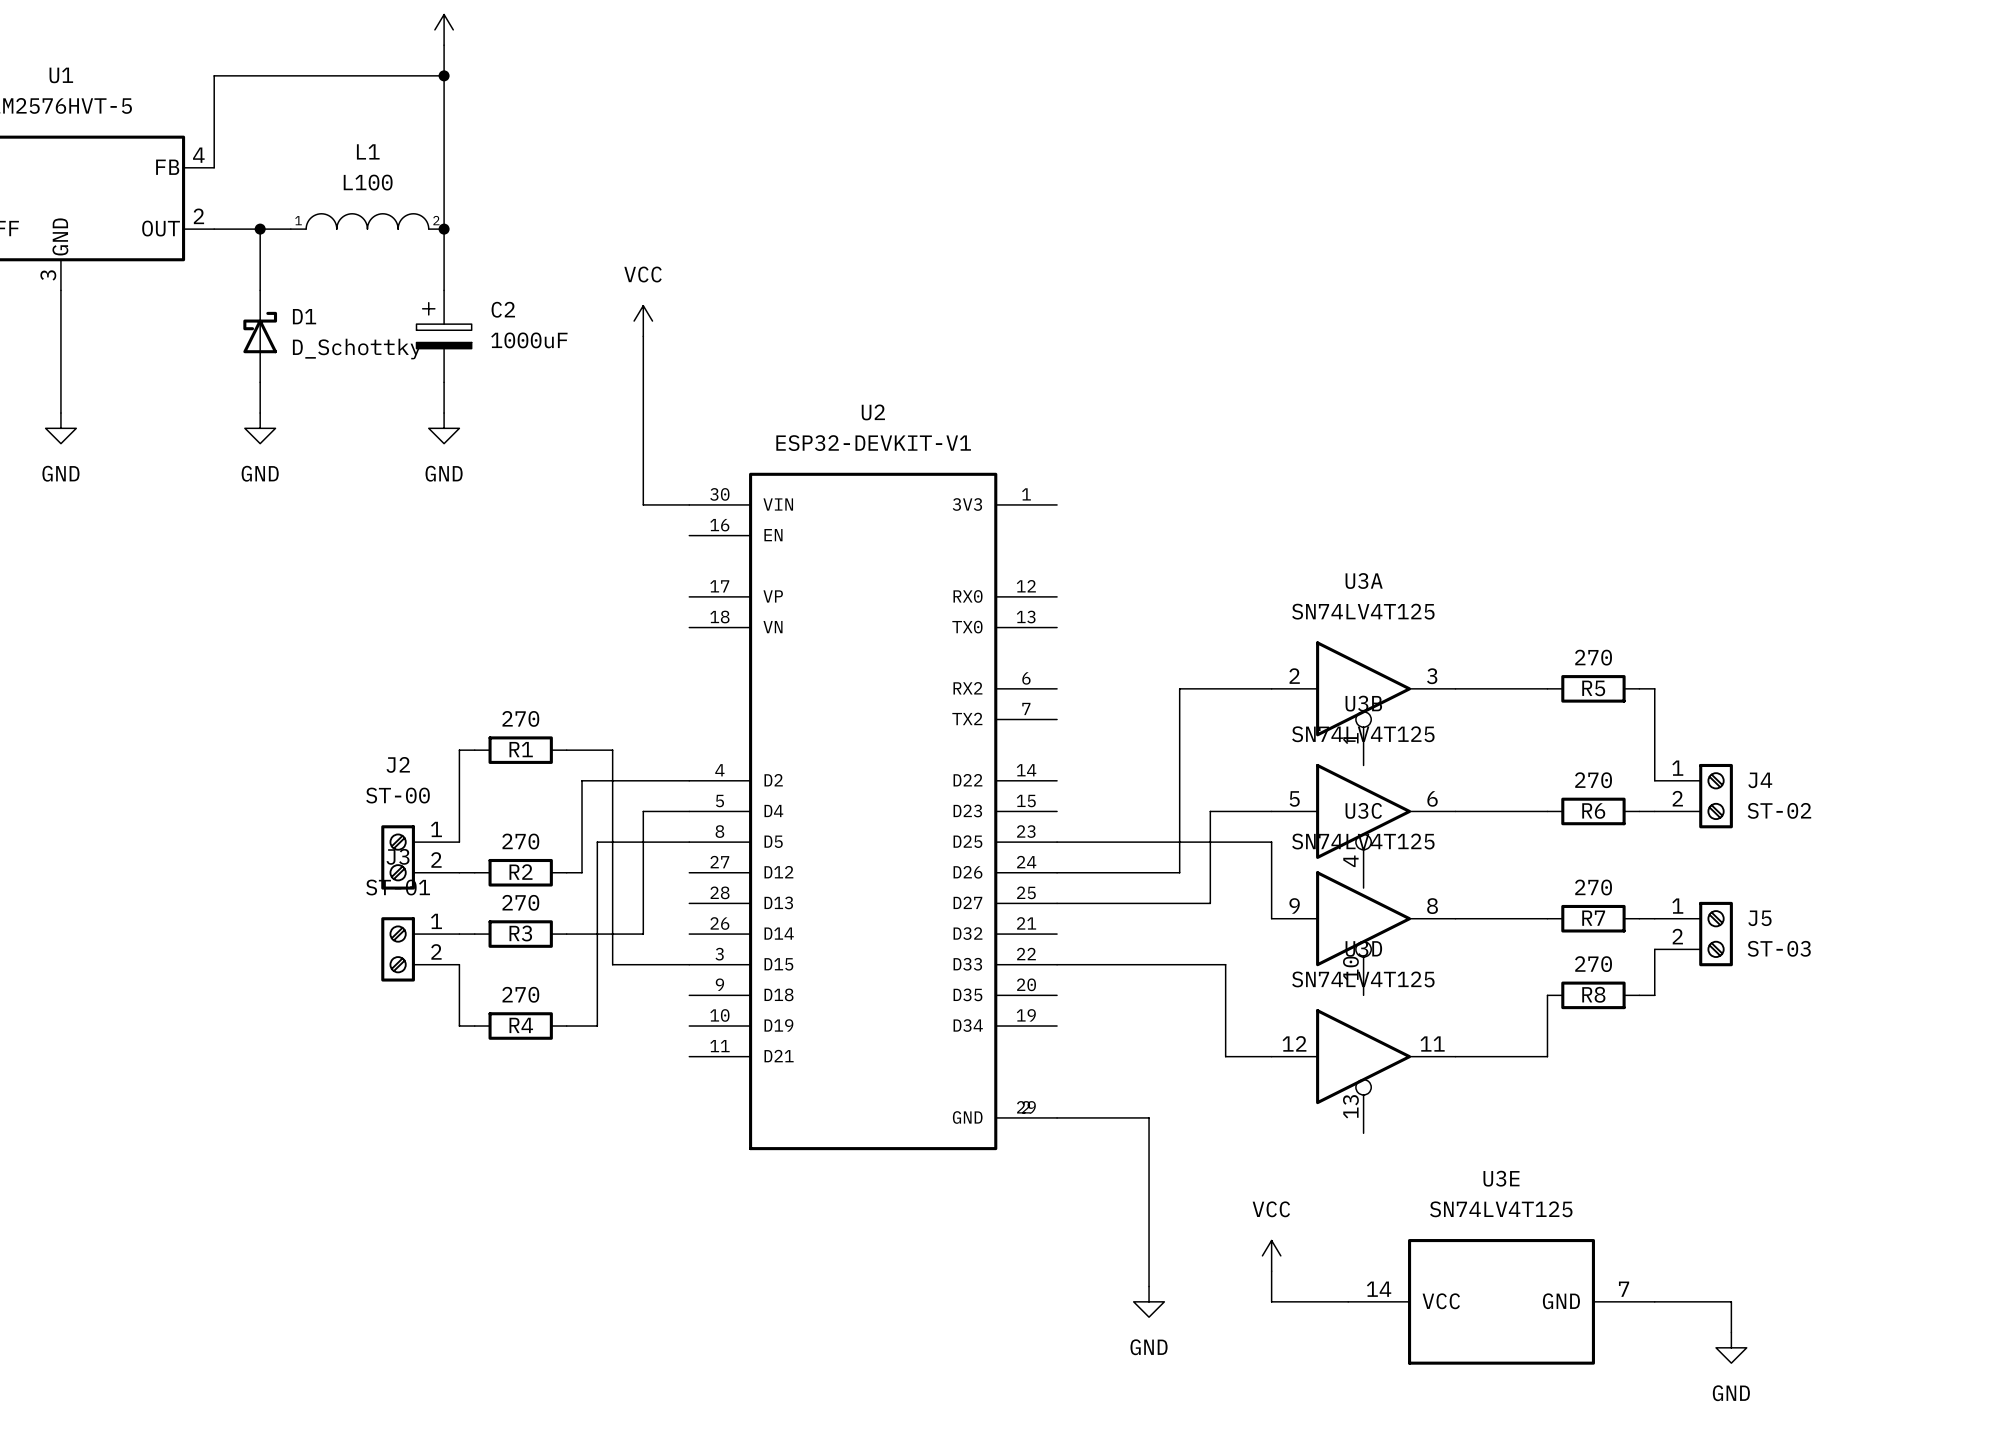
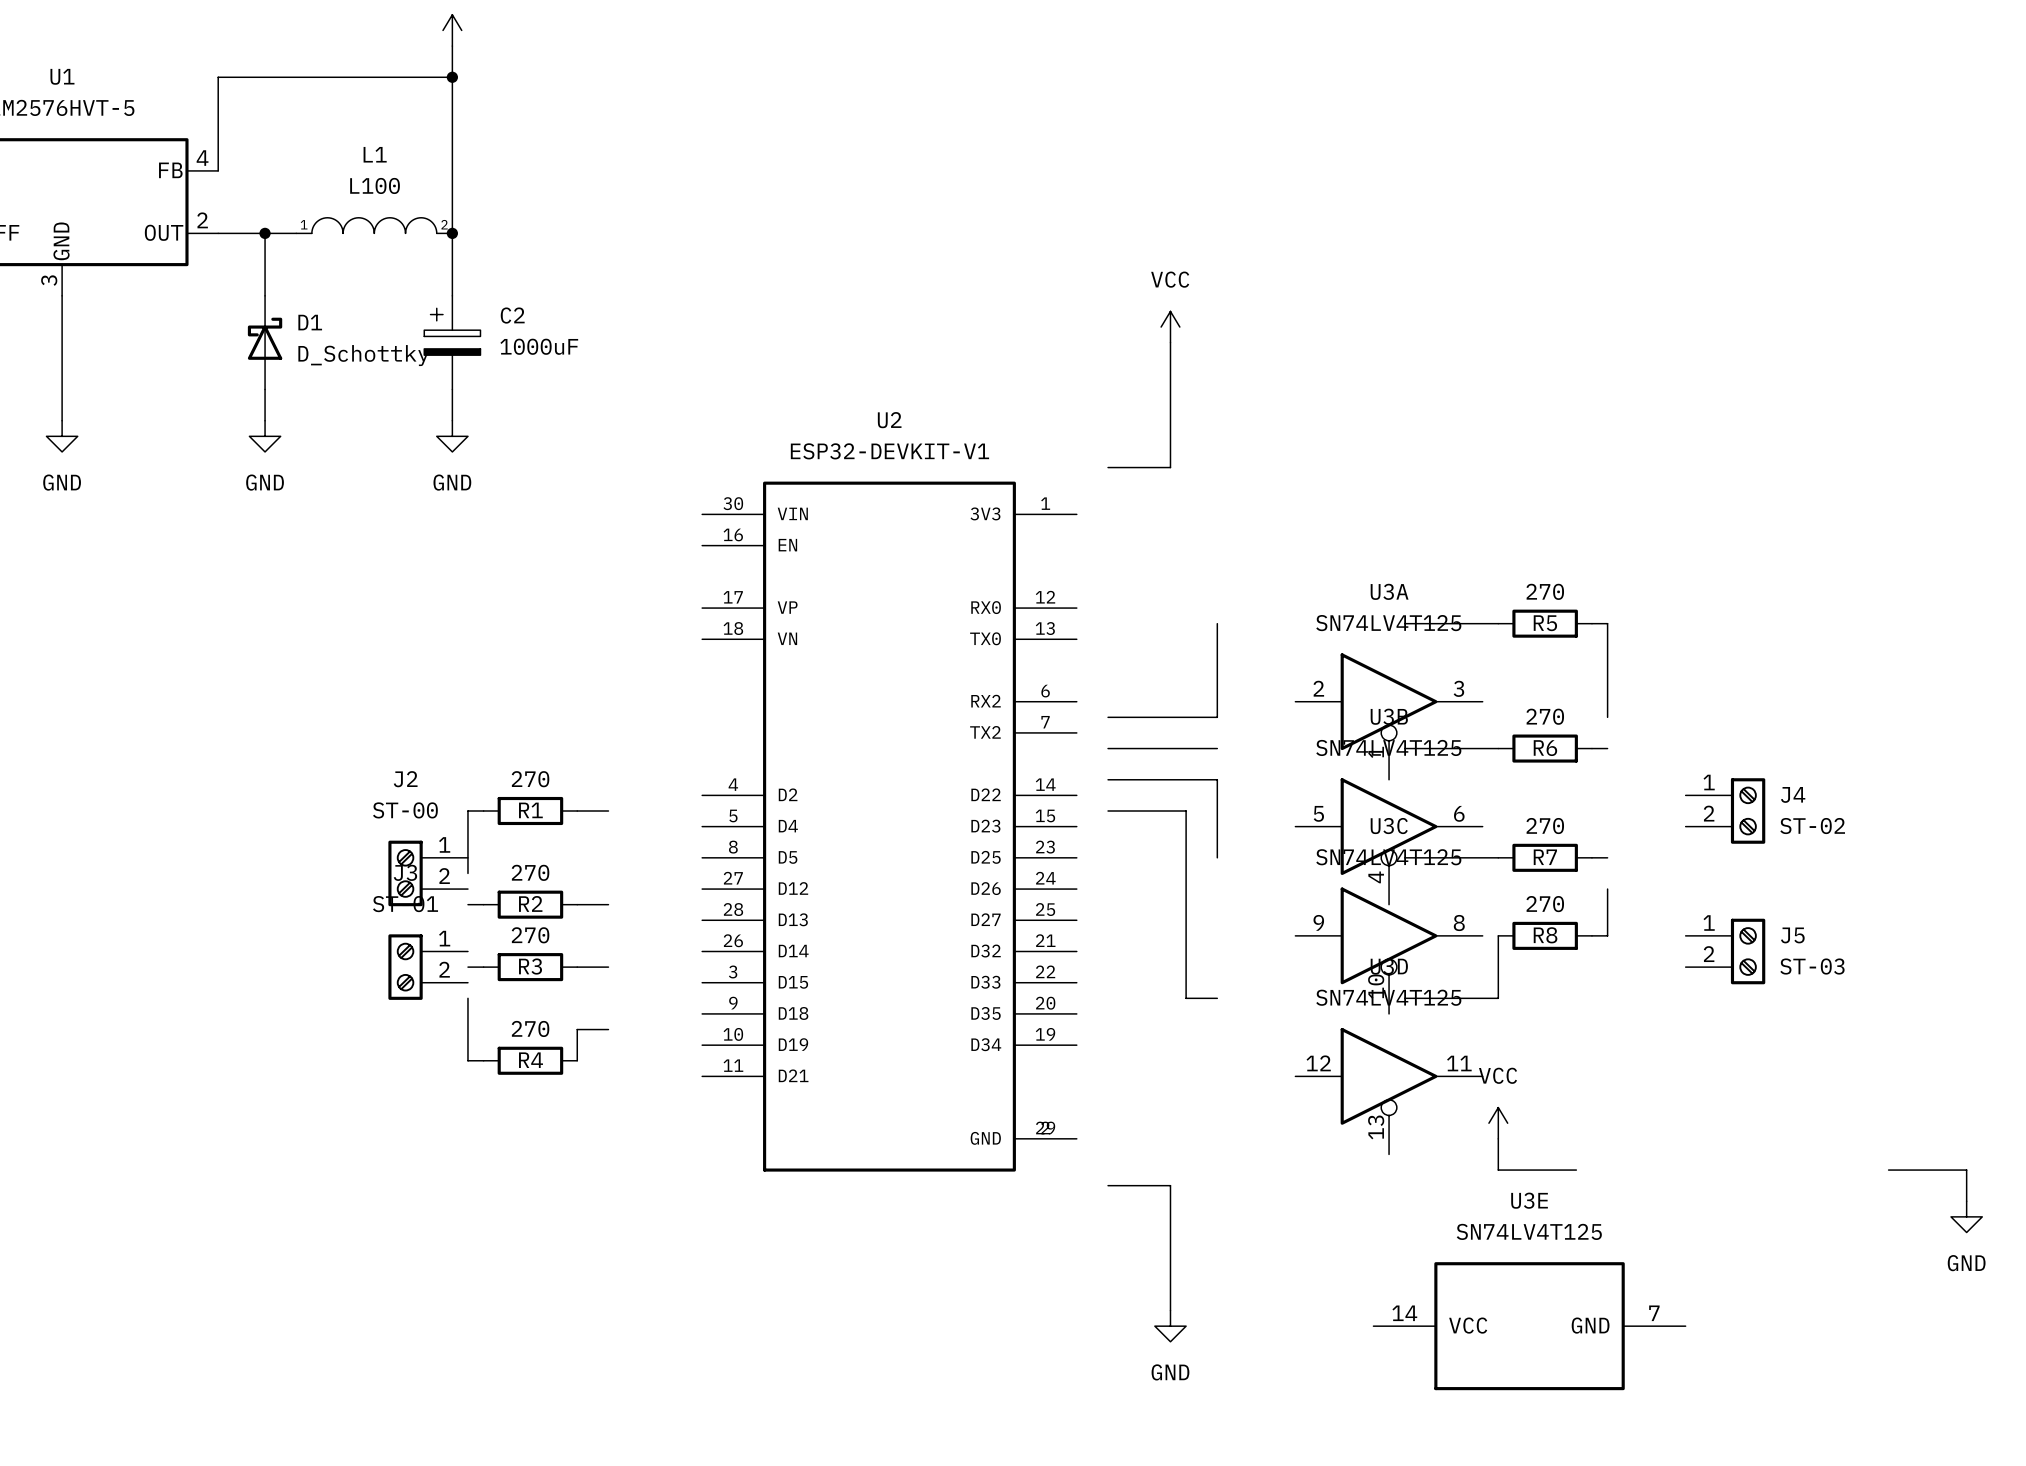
power symbol: VCC (643, 321) -> none
power symbol: none -> VCC (1170, 327)
wire: (643, 336) (643, 504) (689, 504) -> none
wire: none -> (1170, 342) (1170, 467) (1108, 467)
wire: none -> (1217, 623) (1217, 717) (1108, 717)
wire: (1271, 688) (1179, 688) (1179, 872) (1057, 872) -> none
wire: (1455, 688) (1547, 688) -> (1404, 623) (1498, 623)
R5 position: (1593, 688) -> (1545, 623)
wire: (1639, 688) (1654, 688) (1654, 780) -> (1591, 623) (1607, 623) (1607, 717)
wire: none -> (1108, 748) (1217, 748)
wire: (474, 750) (459, 750) (459, 796) -> (483, 811) (467, 811)
R1 position: (520, 750) -> (530, 811)
wire: (566, 750) (612, 750) (612, 964) (689, 964) -> none
wire: none -> (1108, 779) (1217, 779) (1217, 857)
wire: (689, 780) (582, 780) (582, 872) (566, 872) -> none
wire: none -> (577, 811) (608, 811)
wire: none -> (1108, 811) (1186, 811) (1186, 998) (1217, 998)
wire: (689, 811) (643, 811) (643, 934) (566, 934) -> none
wire: (1271, 811) (1210, 811) (1210, 903) (1057, 903) -> none
wire: (1455, 811) (1547, 811) -> (1404, 748) (1498, 748)
R6 position: (1593, 811) -> (1545, 748)
wire: (1639, 811) (1654, 811) -> (1591, 748) (1607, 748)
wire: (689, 842) (597, 842) (597, 1026) (566, 1026) -> none
wire: (1057, 842) (1271, 842) (1271, 918) -> none
wire: (459, 872) (474, 872) -> (467, 904) (483, 904)
R2 position: (520, 872) -> (530, 904)
wire: none -> (577, 904) (608, 904)
wire: (1455, 918) (1547, 918) -> (1404, 857) (1498, 857)
R7 position: (1593, 918) -> (1545, 857)
wire: (1639, 918) (1654, 918) -> (1591, 857) (1607, 857)
wire: (459, 934) (474, 934) -> (467, 967) (483, 967)
R3 position: (520, 934) -> (530, 967)
wire: none -> (577, 967) (608, 967)
wire: (1654, 949) (1654, 995) (1639, 995) -> (1607, 889) (1607, 935) (1591, 935)
wire: (459, 964) (459, 980) -> (467, 857) (467, 873)
wire: (1057, 964) (1225, 964) (1225, 1056) (1271, 1056) -> none
wire: (1547, 995) (1547, 1056) (1455, 1056) -> (1498, 935) (1498, 998) (1404, 998)
R8 position: (1593, 995) -> (1545, 935)
wire: none -> (608, 1029) (577, 1029) (577, 1060)
wire: (459, 1026) (474, 1026) -> (467, 1045) (467, 1060) (483, 1060)
R4 position: (520, 1026) -> (530, 1060)
wire: (1057, 1117) (1149, 1117) (1149, 1163) -> (1108, 1185) (1170, 1185)
power symbol position: VCC (1271, 1255) -> VCC (1498, 1123)
wire: (1271, 1271) (1271, 1301) (1348, 1301) -> (1498, 1138) (1498, 1170) (1576, 1170)
wire: (1654, 1301) (1731, 1301) (1731, 1332) -> (1888, 1170) (1966, 1170) (1966, 1201)
power symbol position: GND (1731, 1347) -> GND (1966, 1216)

